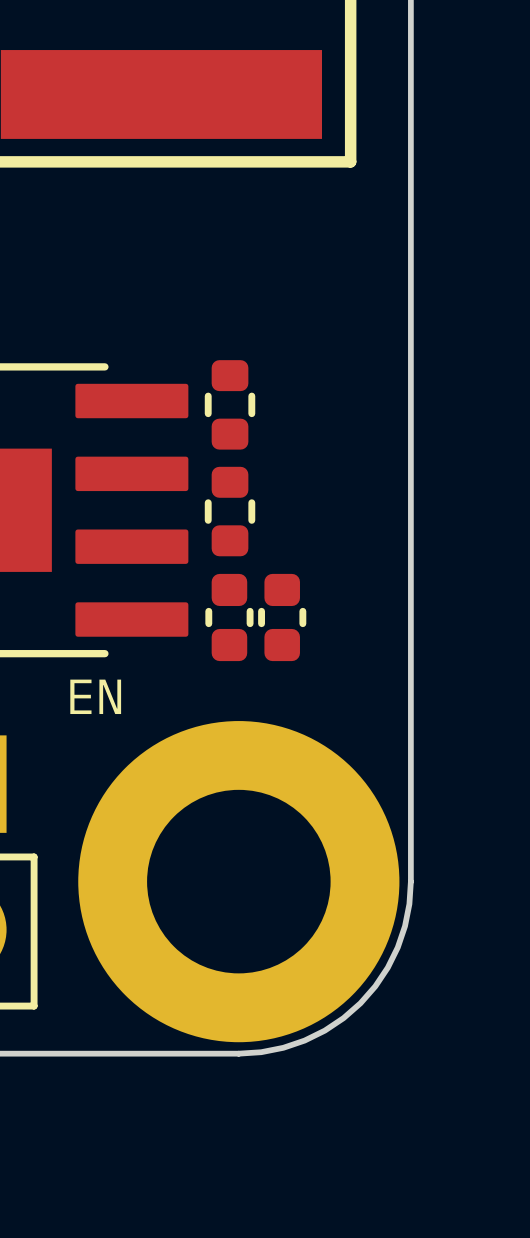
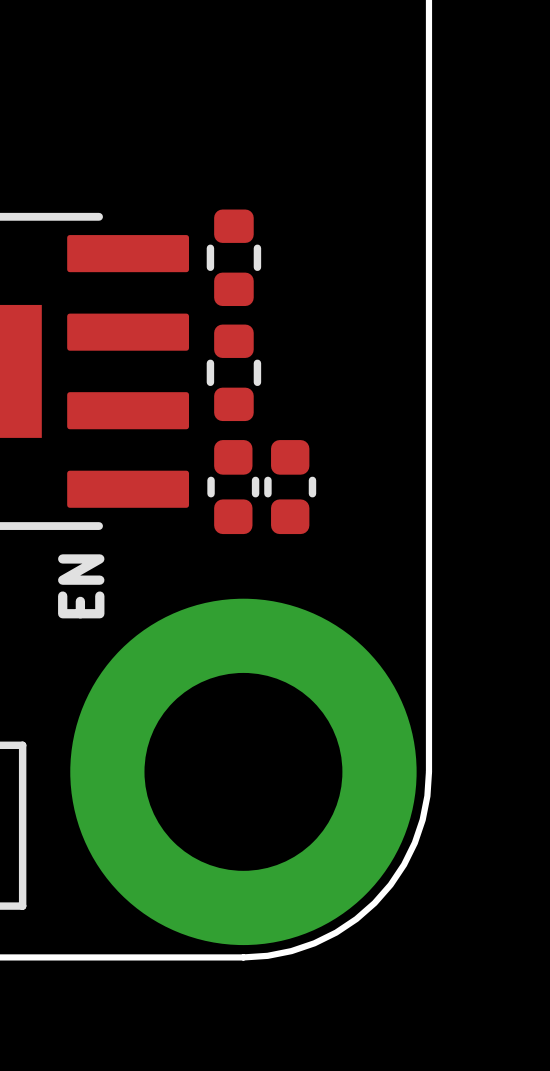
text rotation: 0° (95, 696) -> 90° counterclockwise (81, 586)

